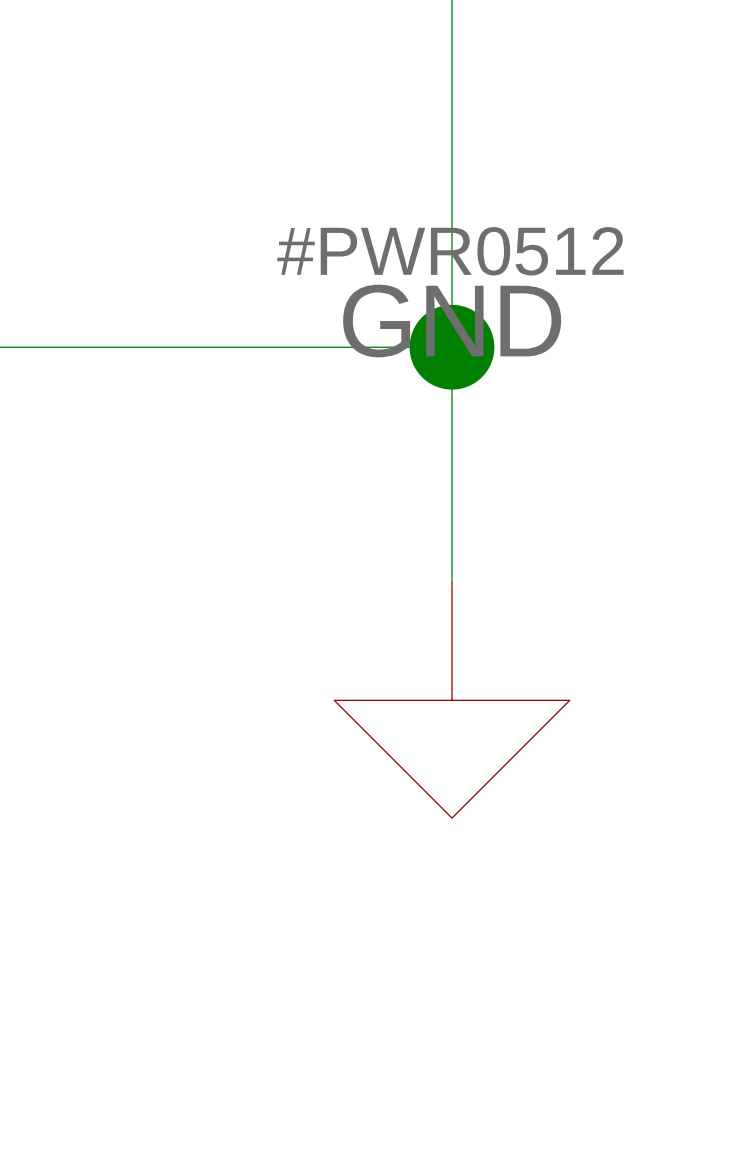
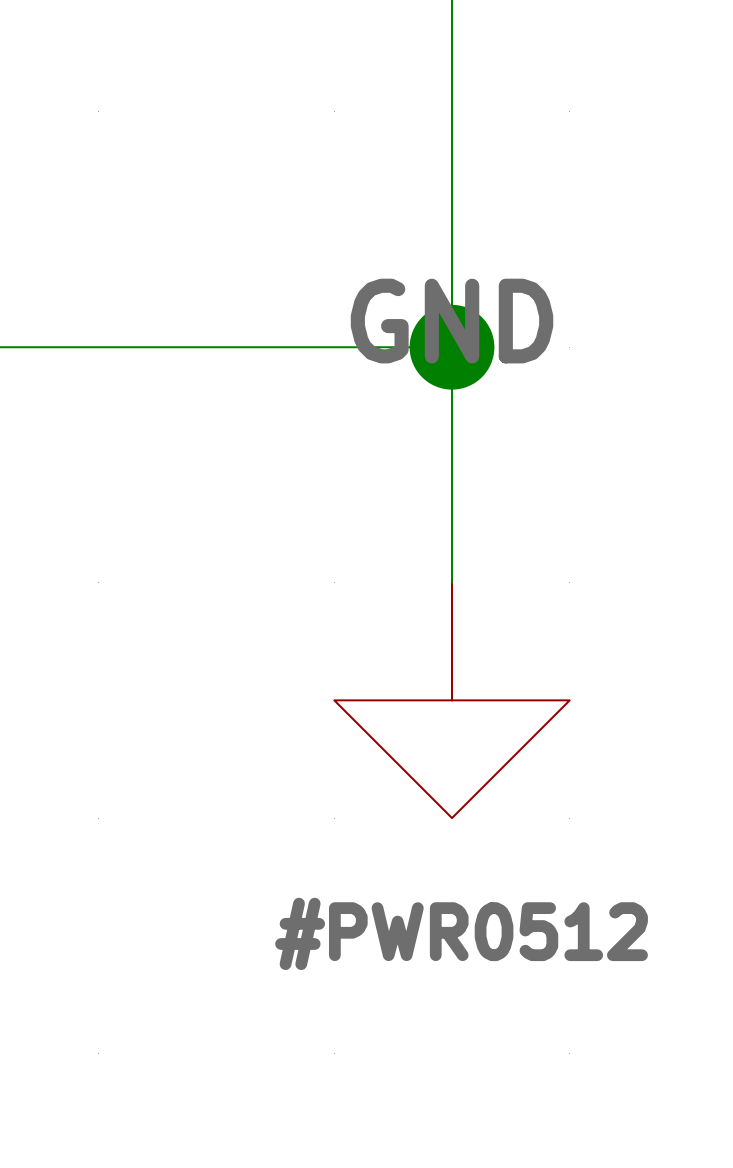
#PWR0512 name position: #PWR0512 (450, 251) -> #PWR0512 (461, 933)

